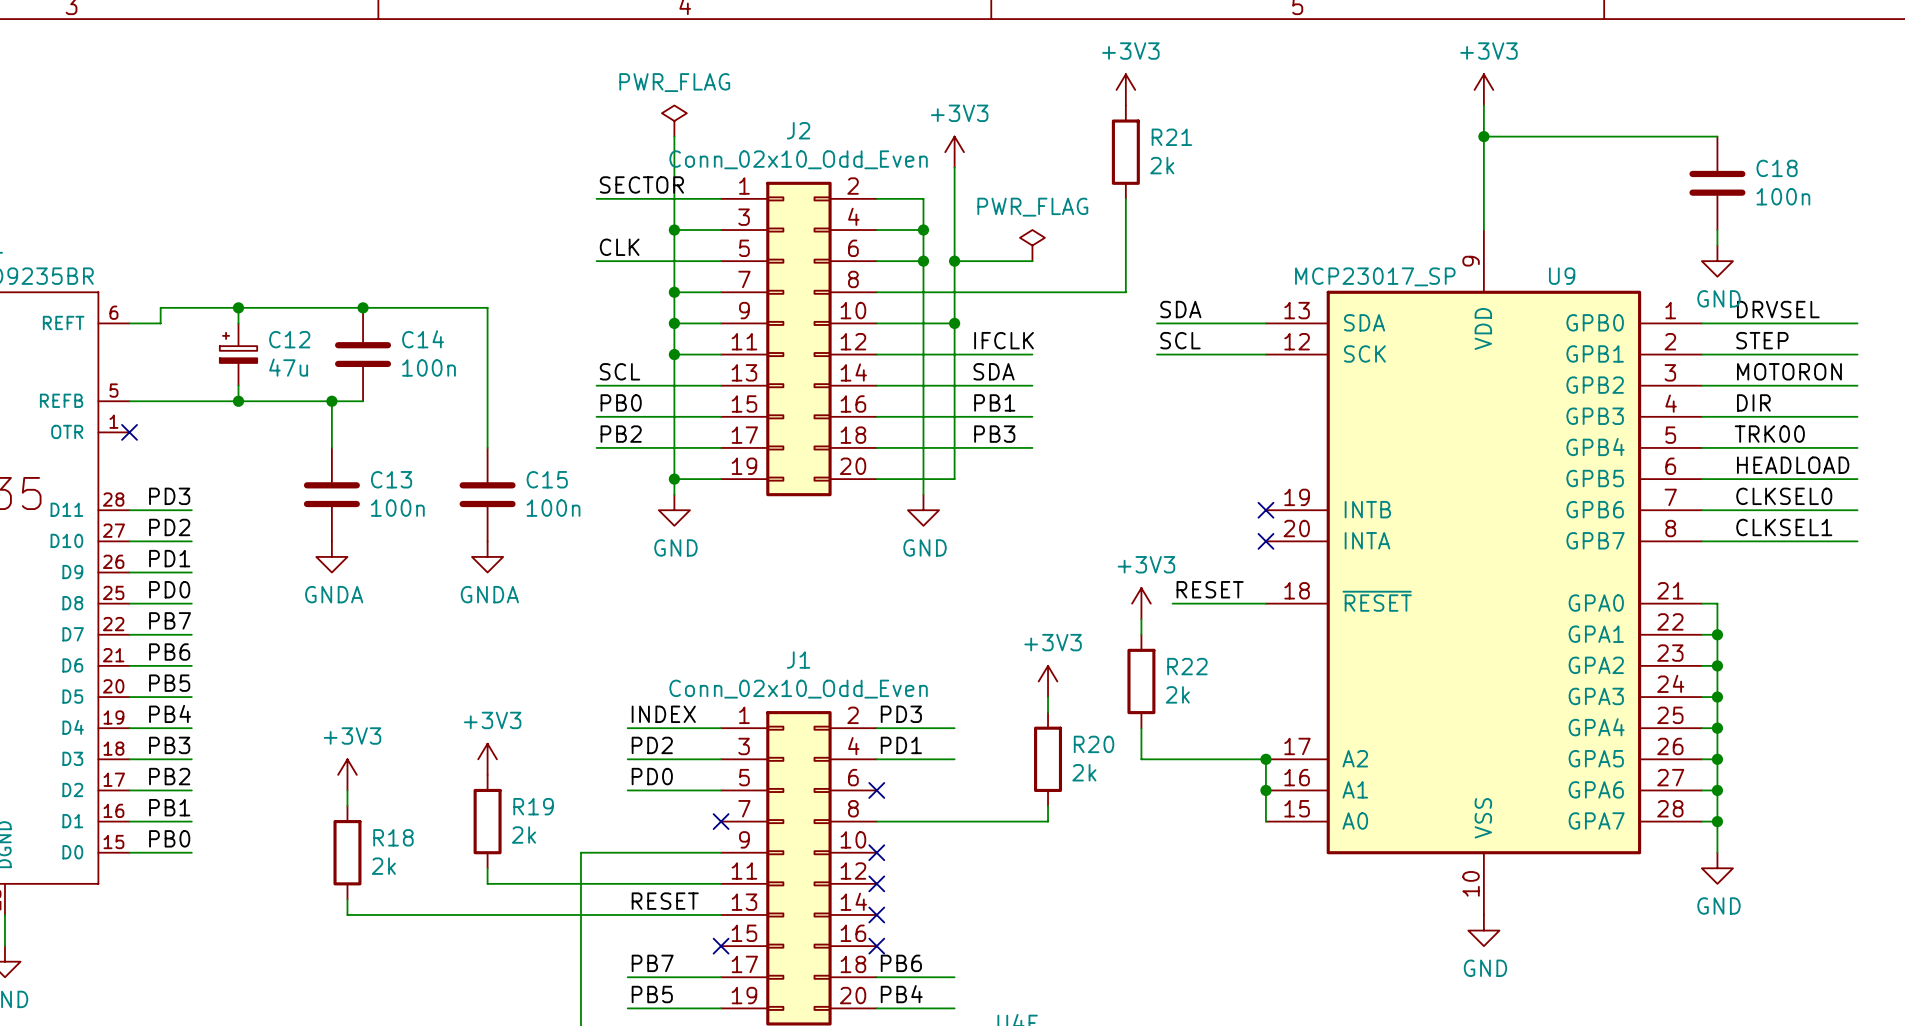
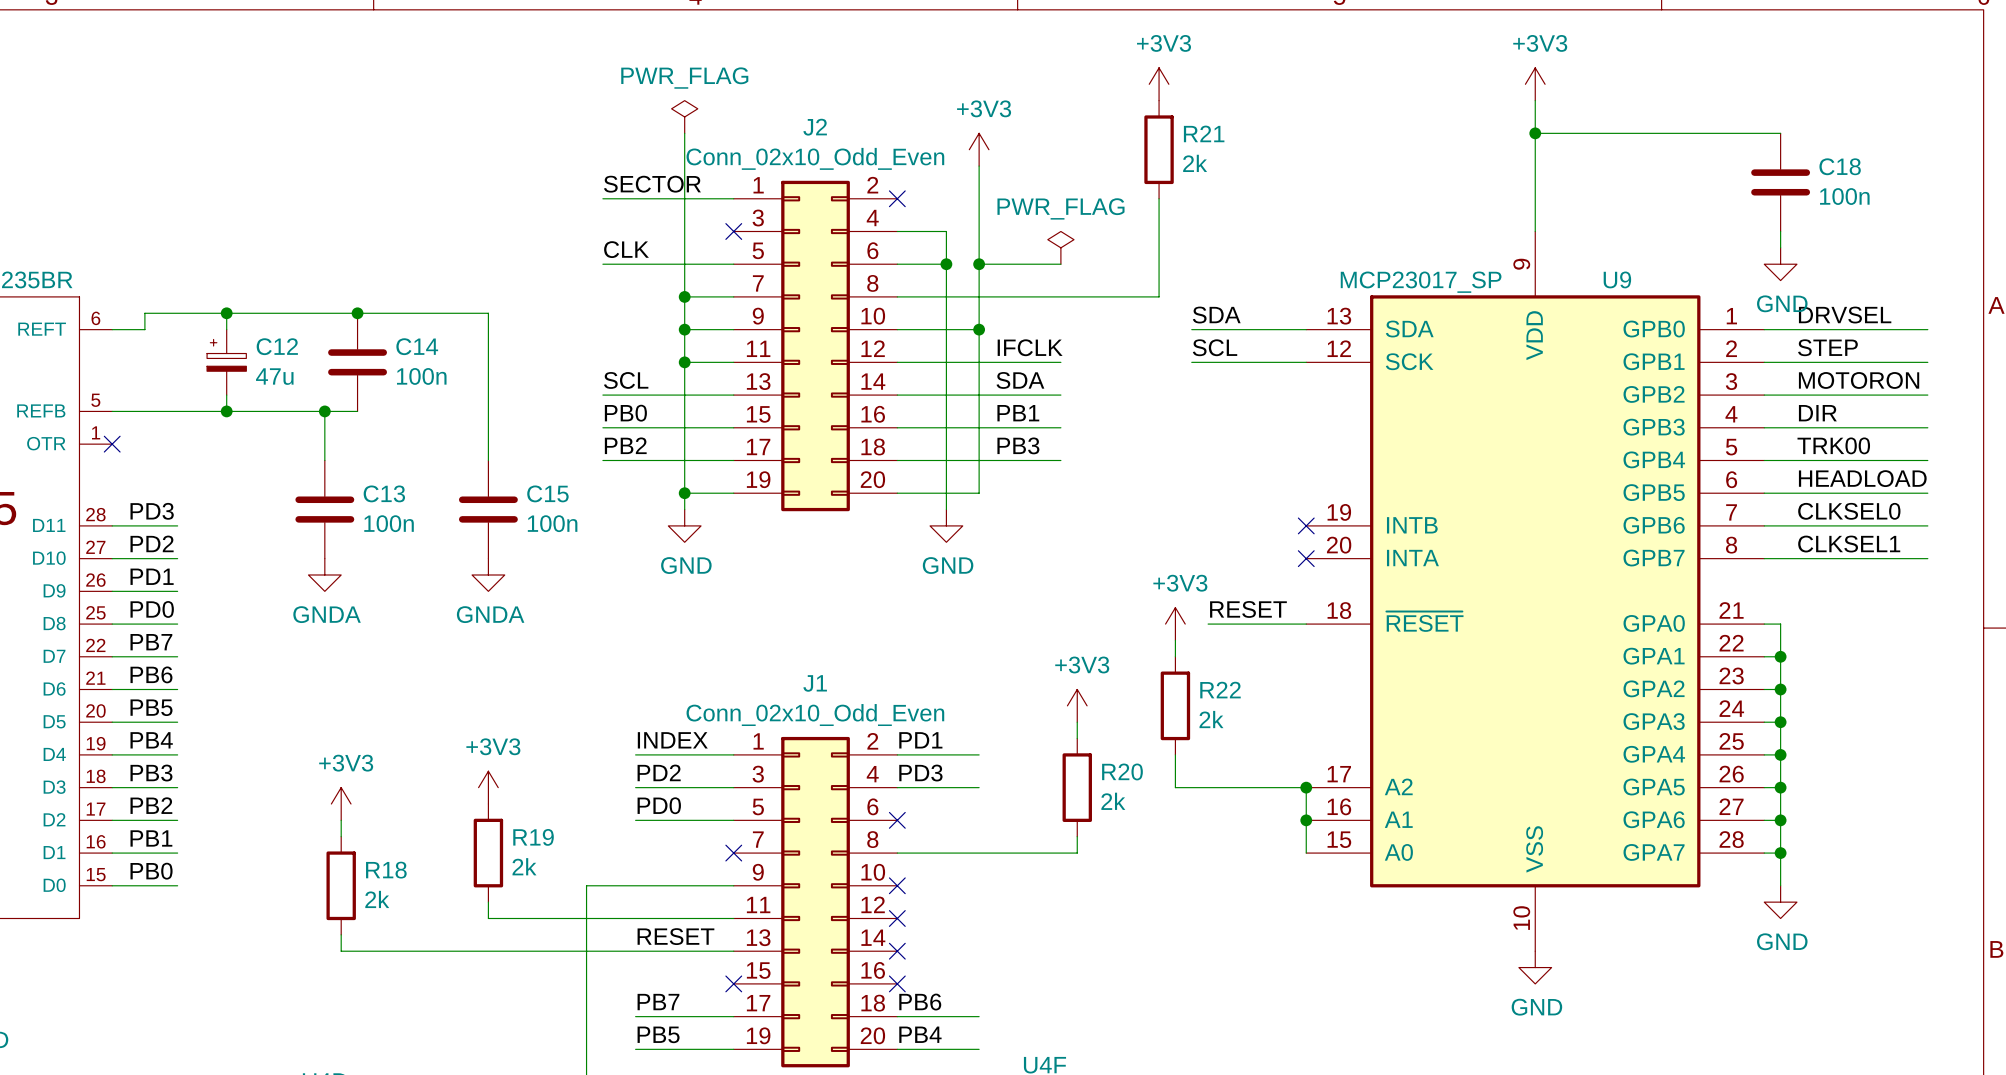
wire: (876, 198) (923, 198) (923, 230) -> none
no-connect mark: none -> (897, 198)
wire: (674, 230) (721, 230) -> none
junction: (674, 230) -> none
no-connect mark: none -> (733, 231)
junction: (923, 230) -> none
label: PD3 (901, 714) -> PD1 (920, 740)
label: PD1 (901, 745) -> PD3 (920, 773)

